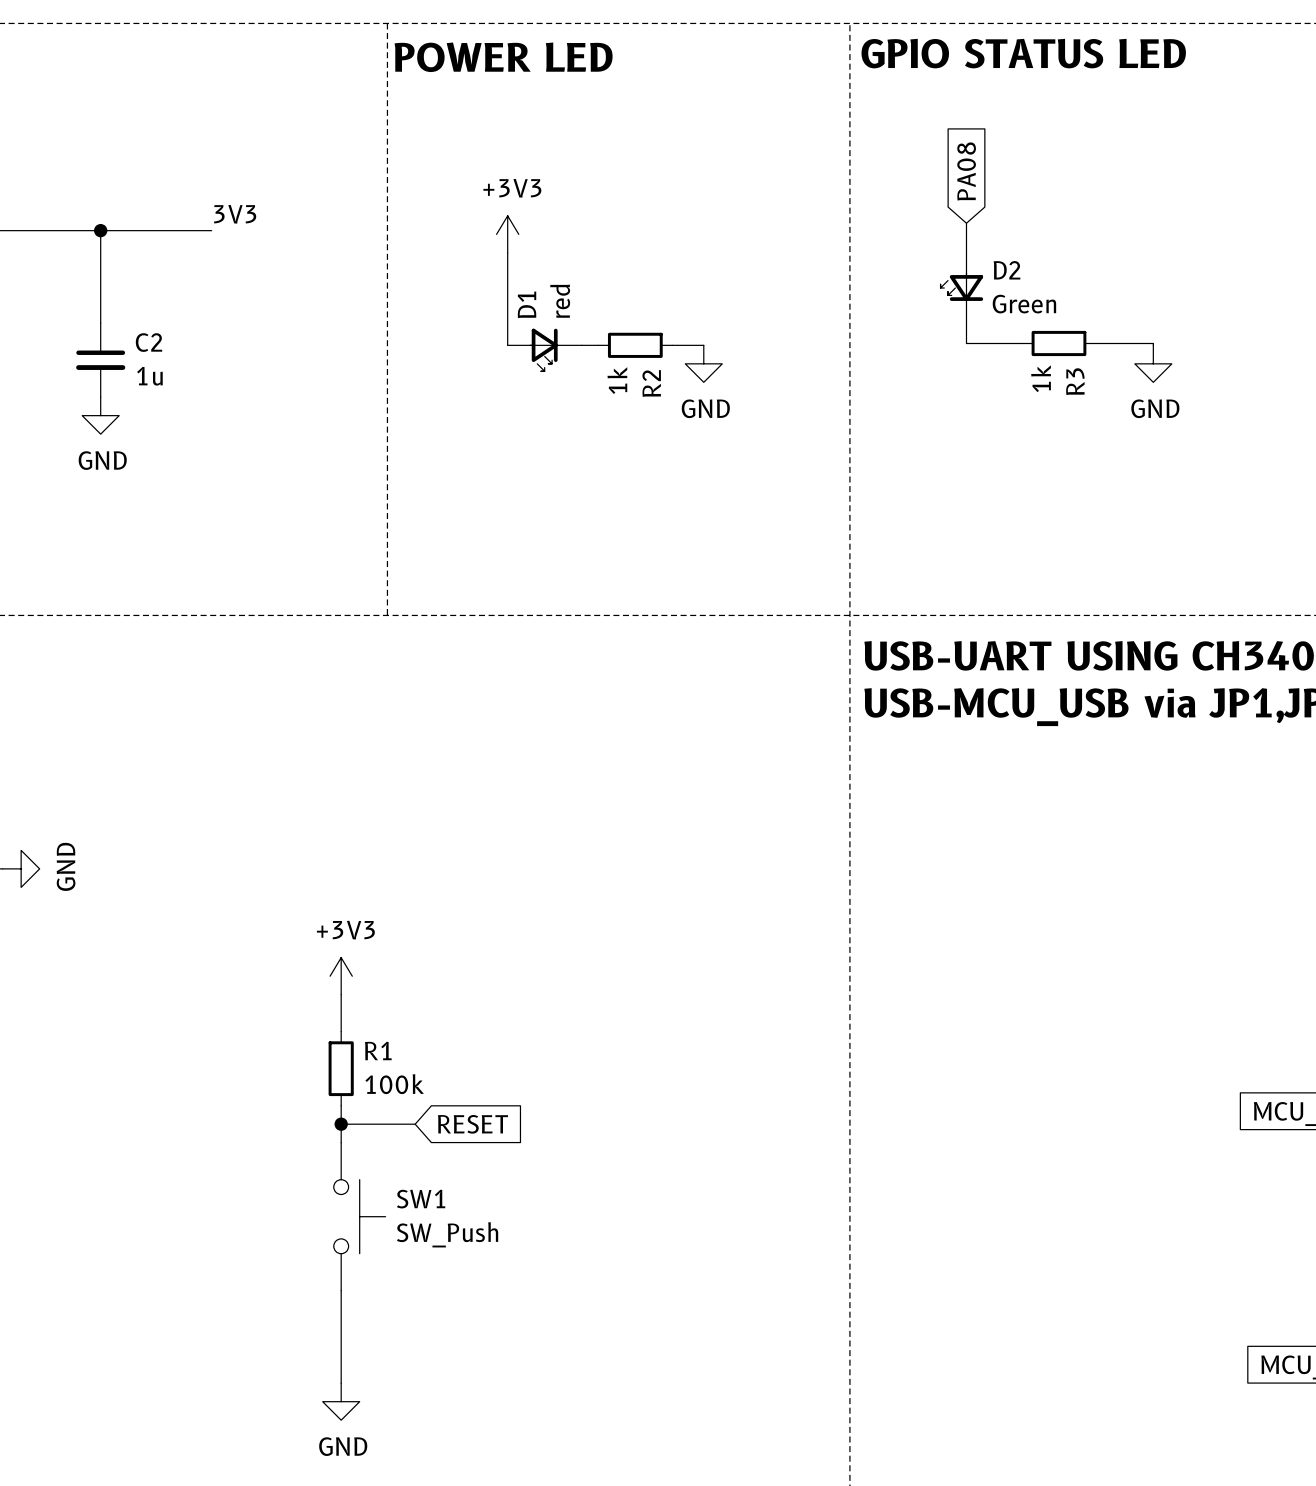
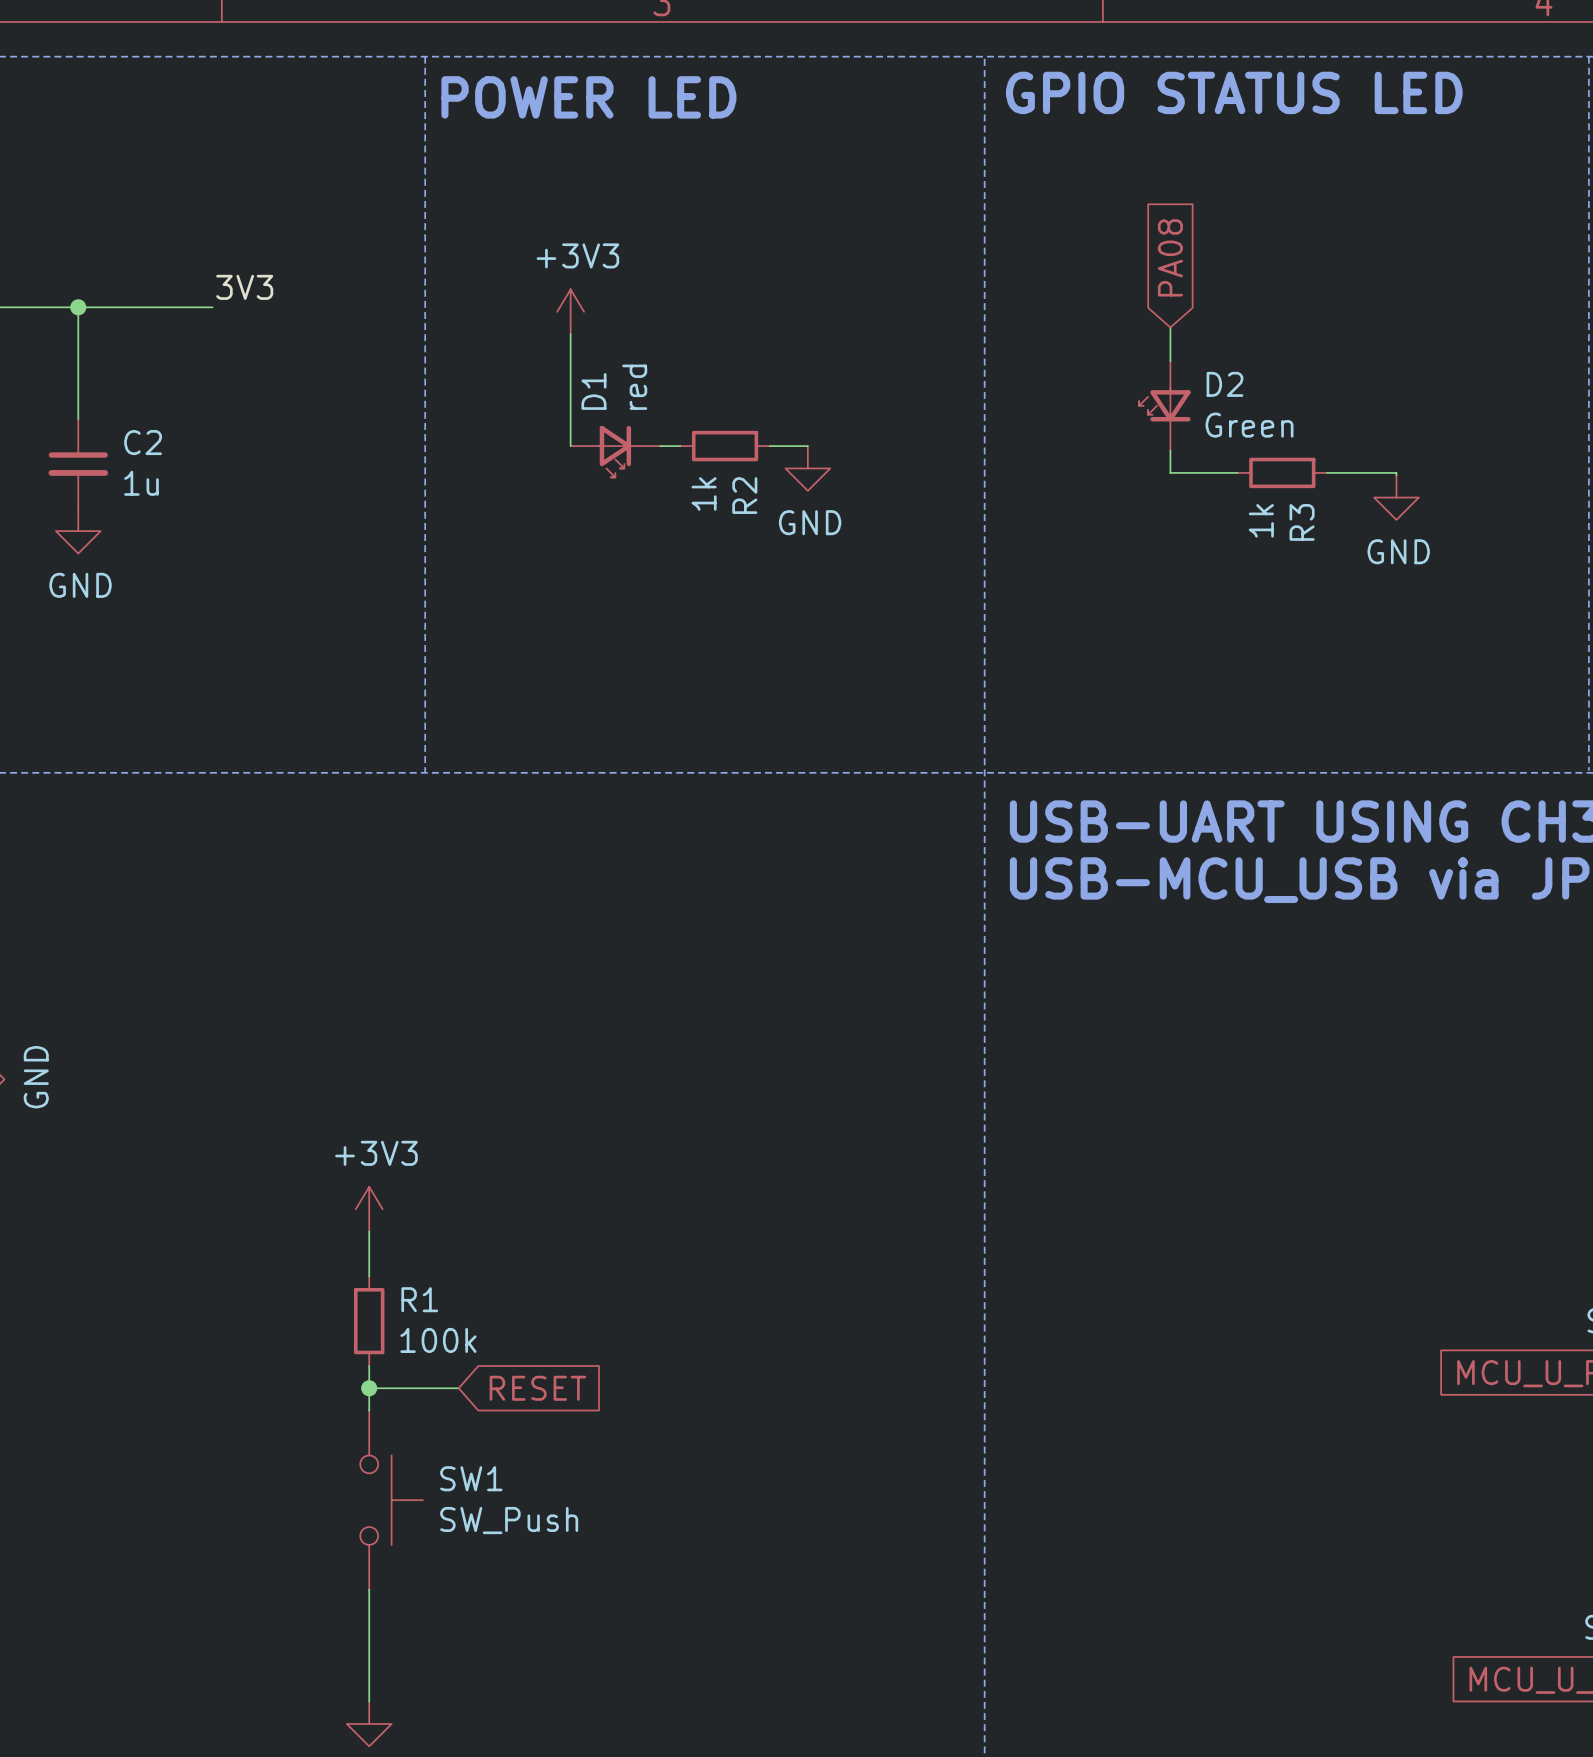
global label position: PA08 (966, 171) -> PA08 (1170, 257)
wire: (966, 223) (966, 251) -> (1170, 327) (1170, 361)
D2 position: (961, 287) -> (1164, 405)
wire: (966, 324) (966, 343) (1021, 343) -> (1170, 450) (1170, 472) (1237, 472)
R3 position: (1058, 343) -> (1282, 472)
wire: (1095, 343) (1153, 343) (1153, 345) -> (1327, 472) (1396, 472) (1396, 475)
power symbol position: GND (1153, 363) -> GND (1396, 497)

